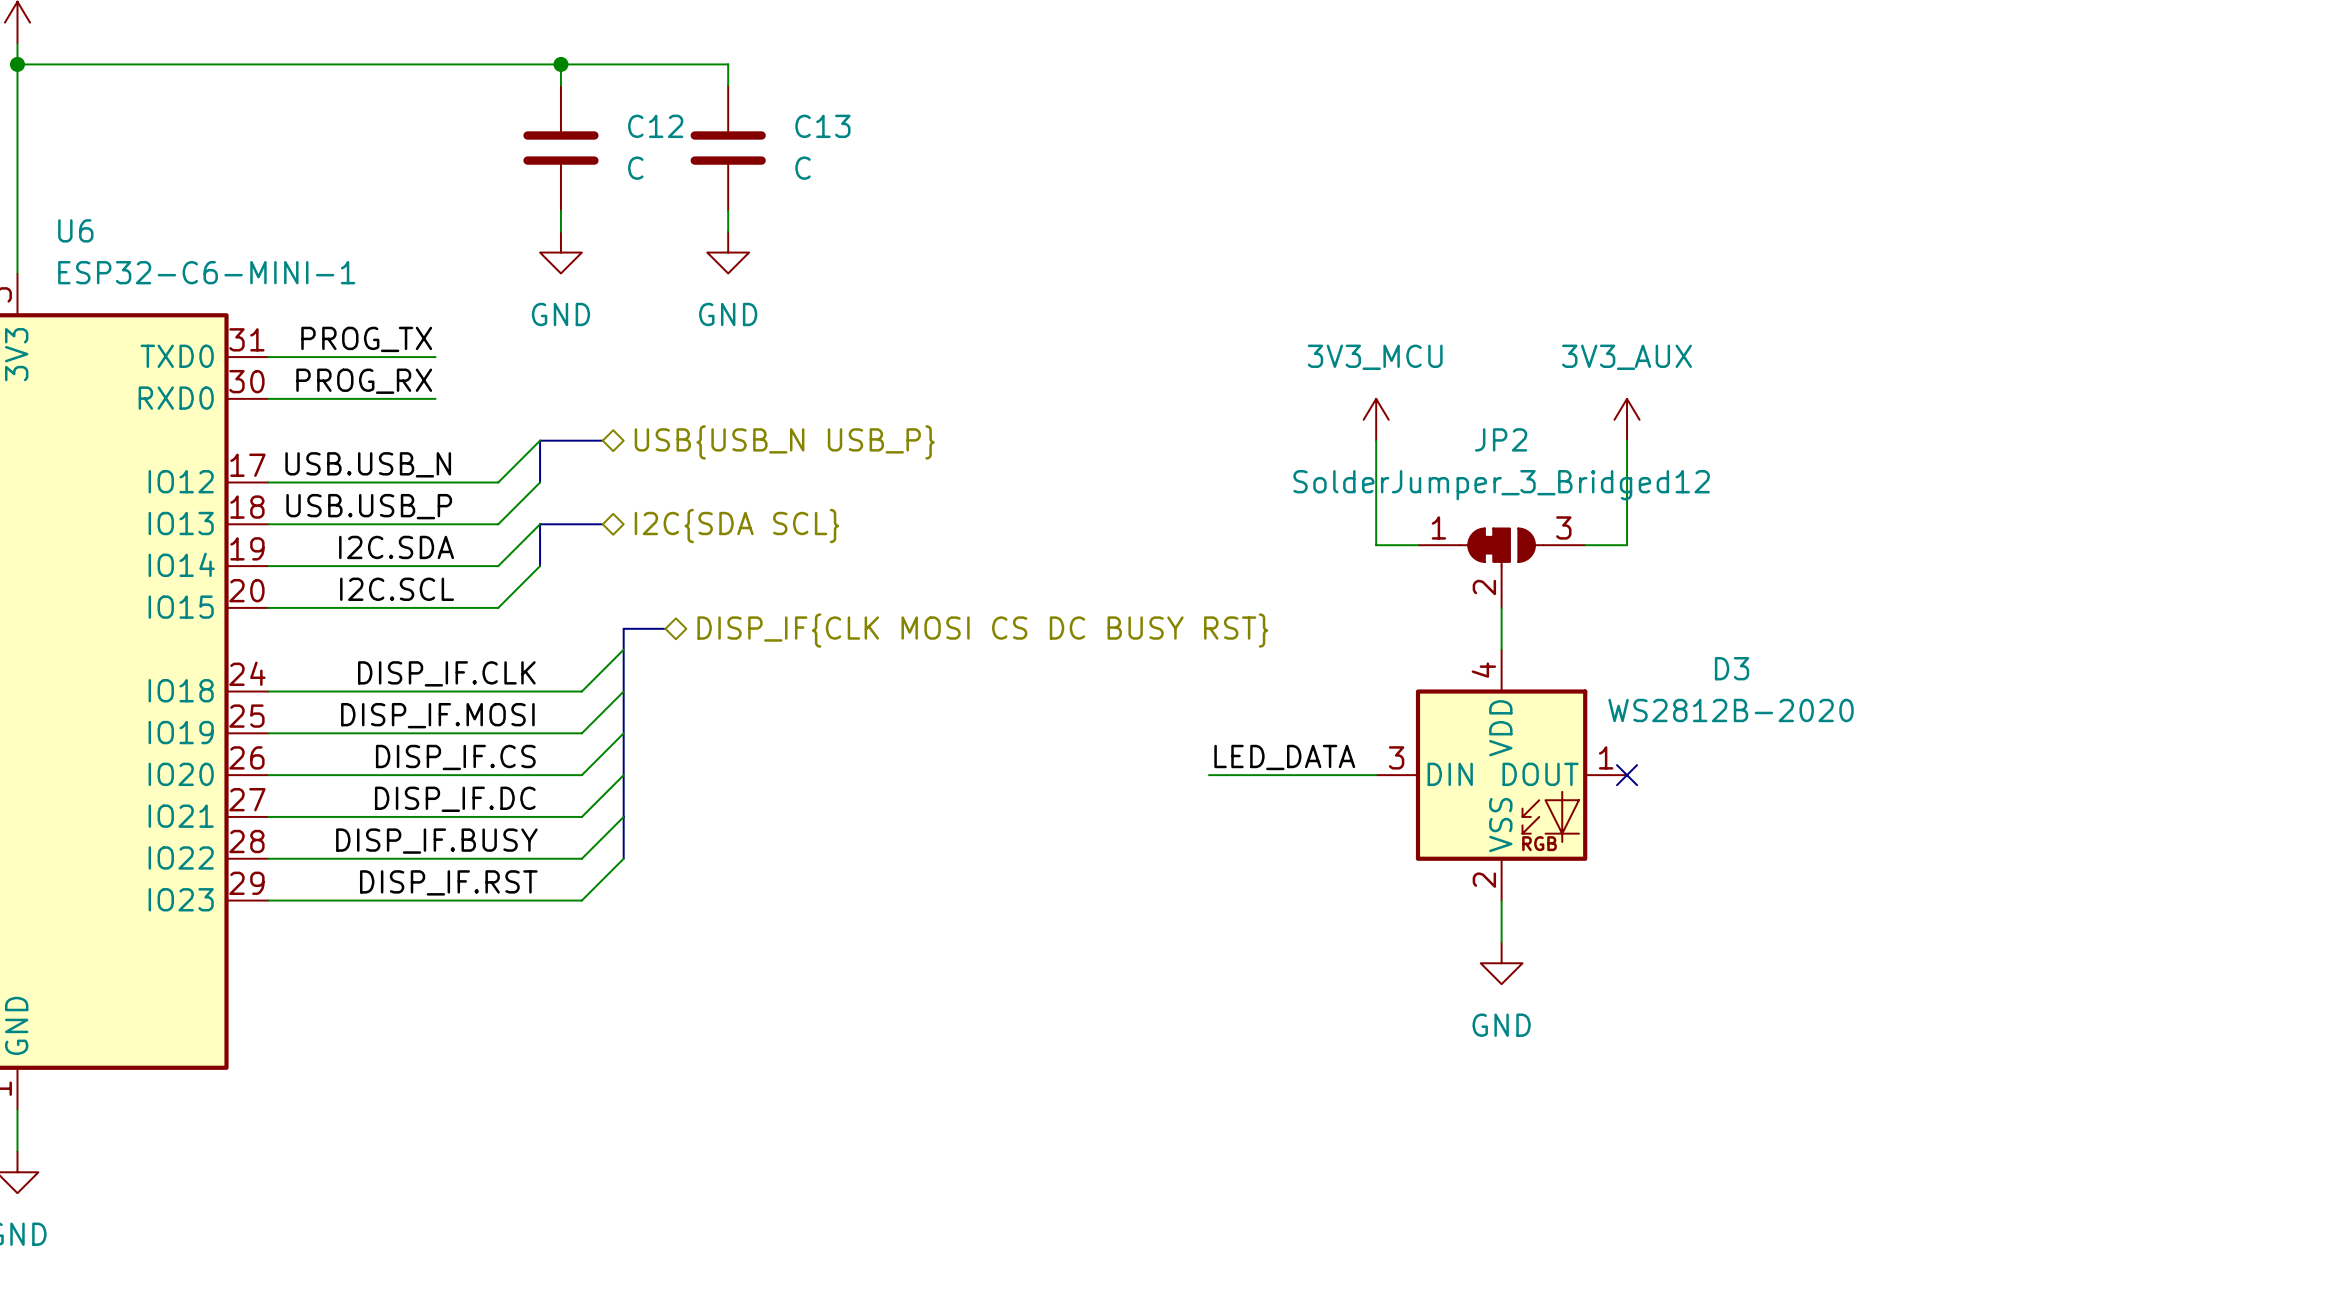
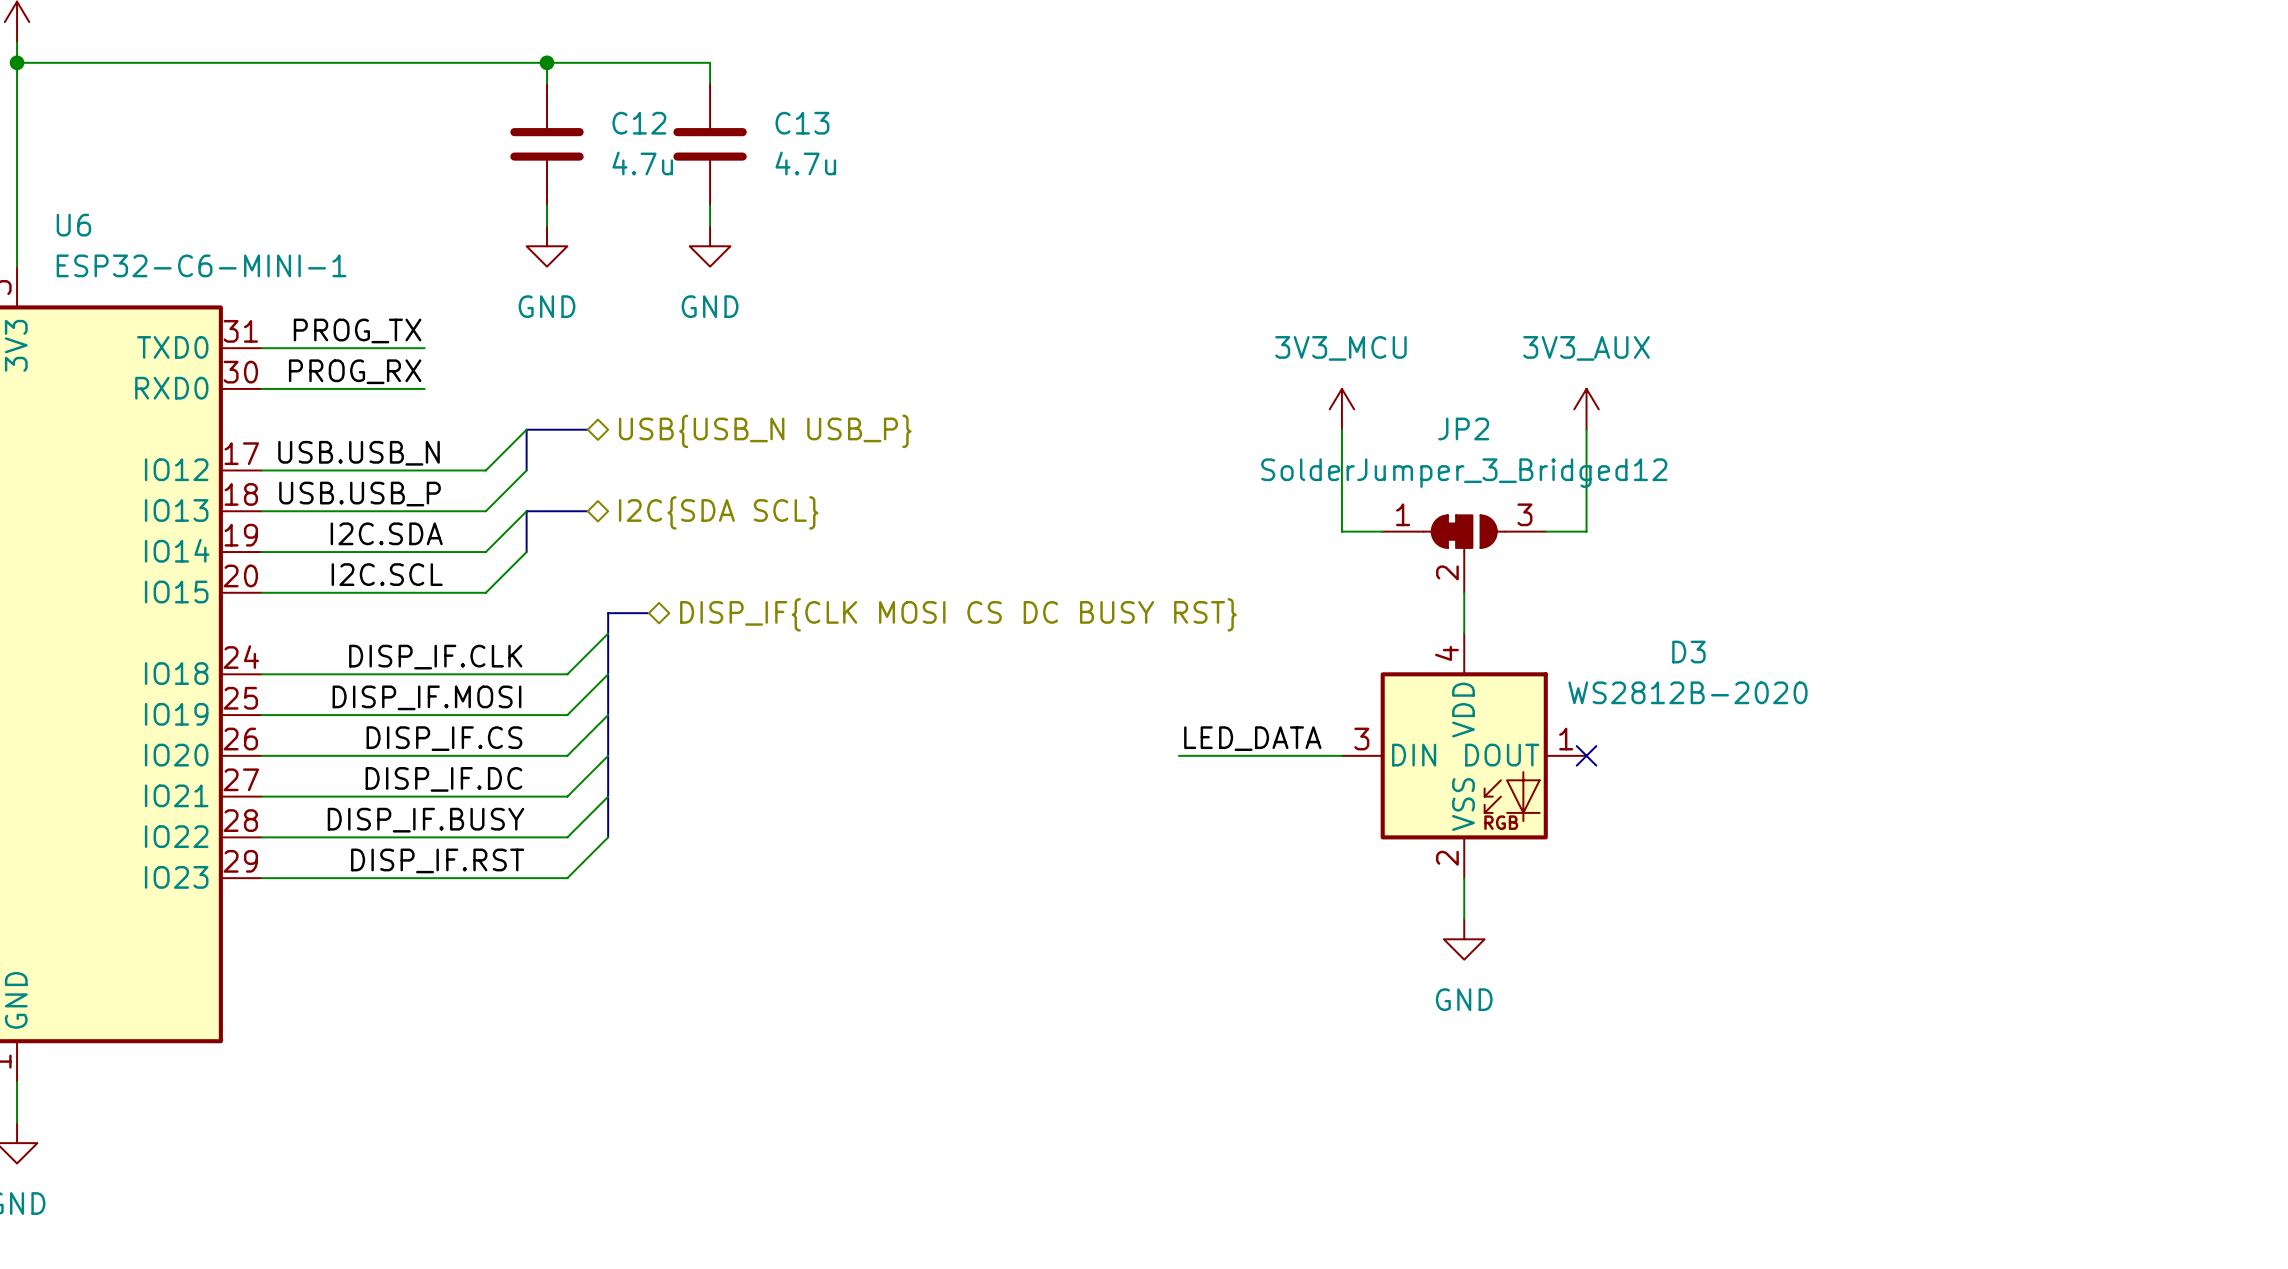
C12 value: C (635, 168) -> 4.7u (642, 163)
C13 value: C (803, 168) -> 4.7u (805, 163)

